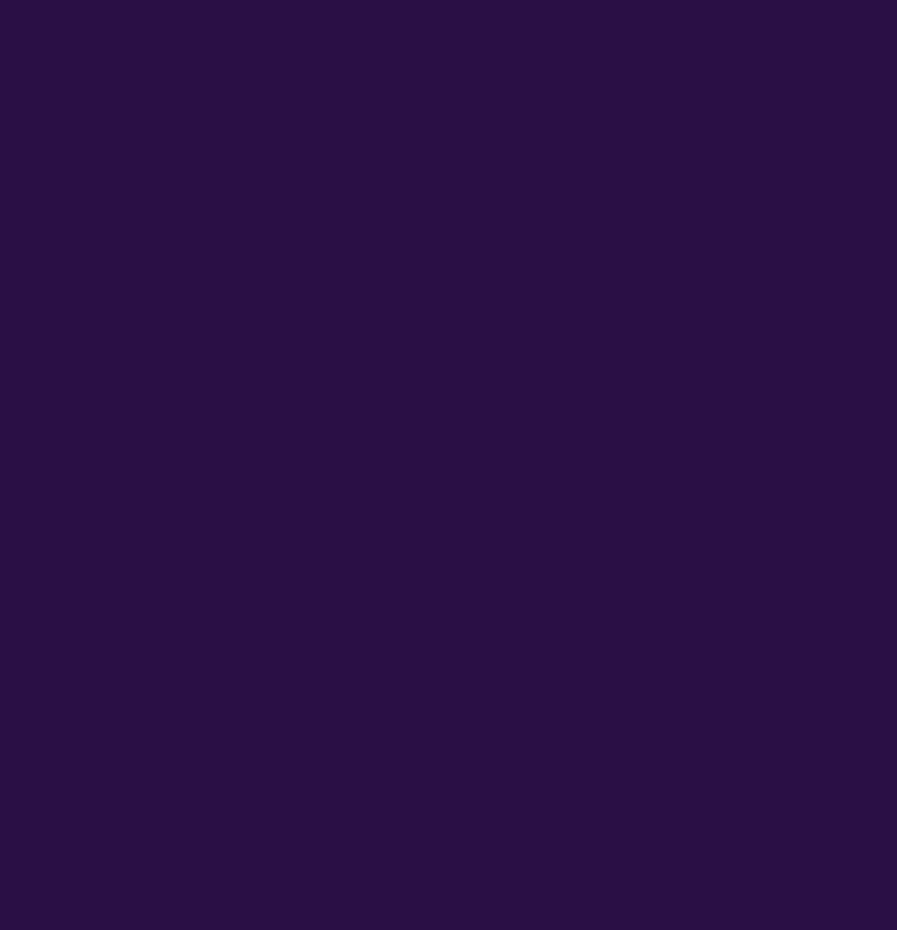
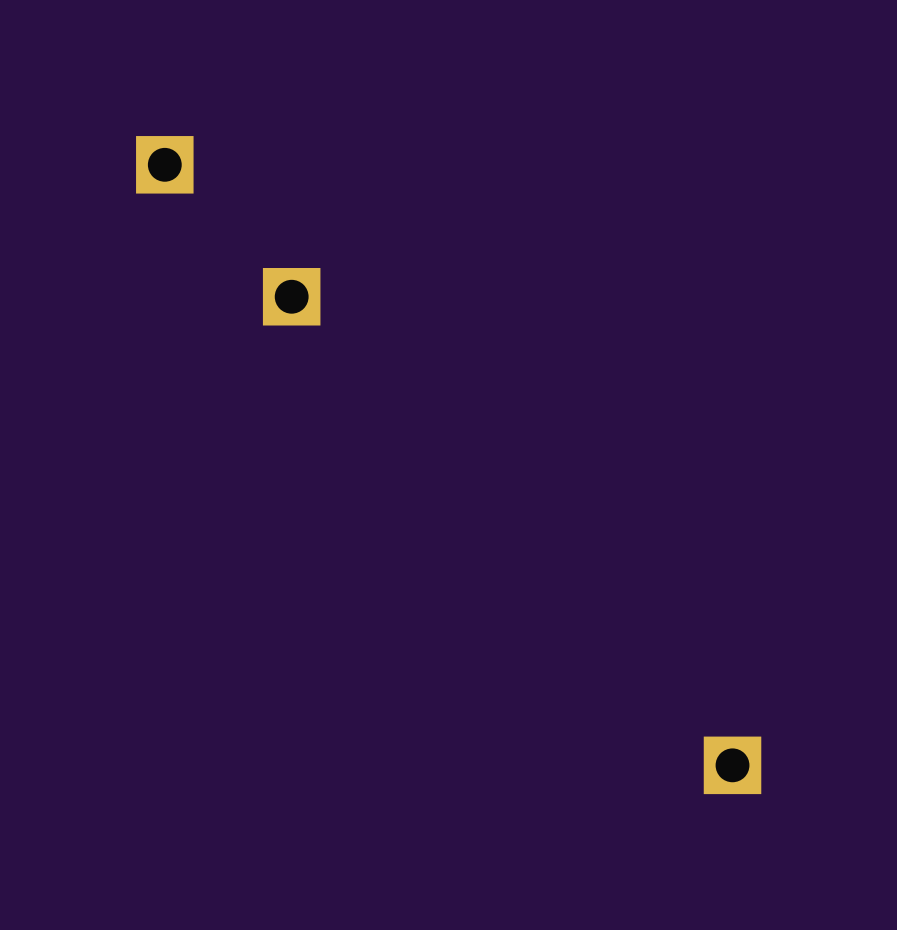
part: none -> (164, 164)
part: none -> (291, 296)
part: none -> (732, 765)

